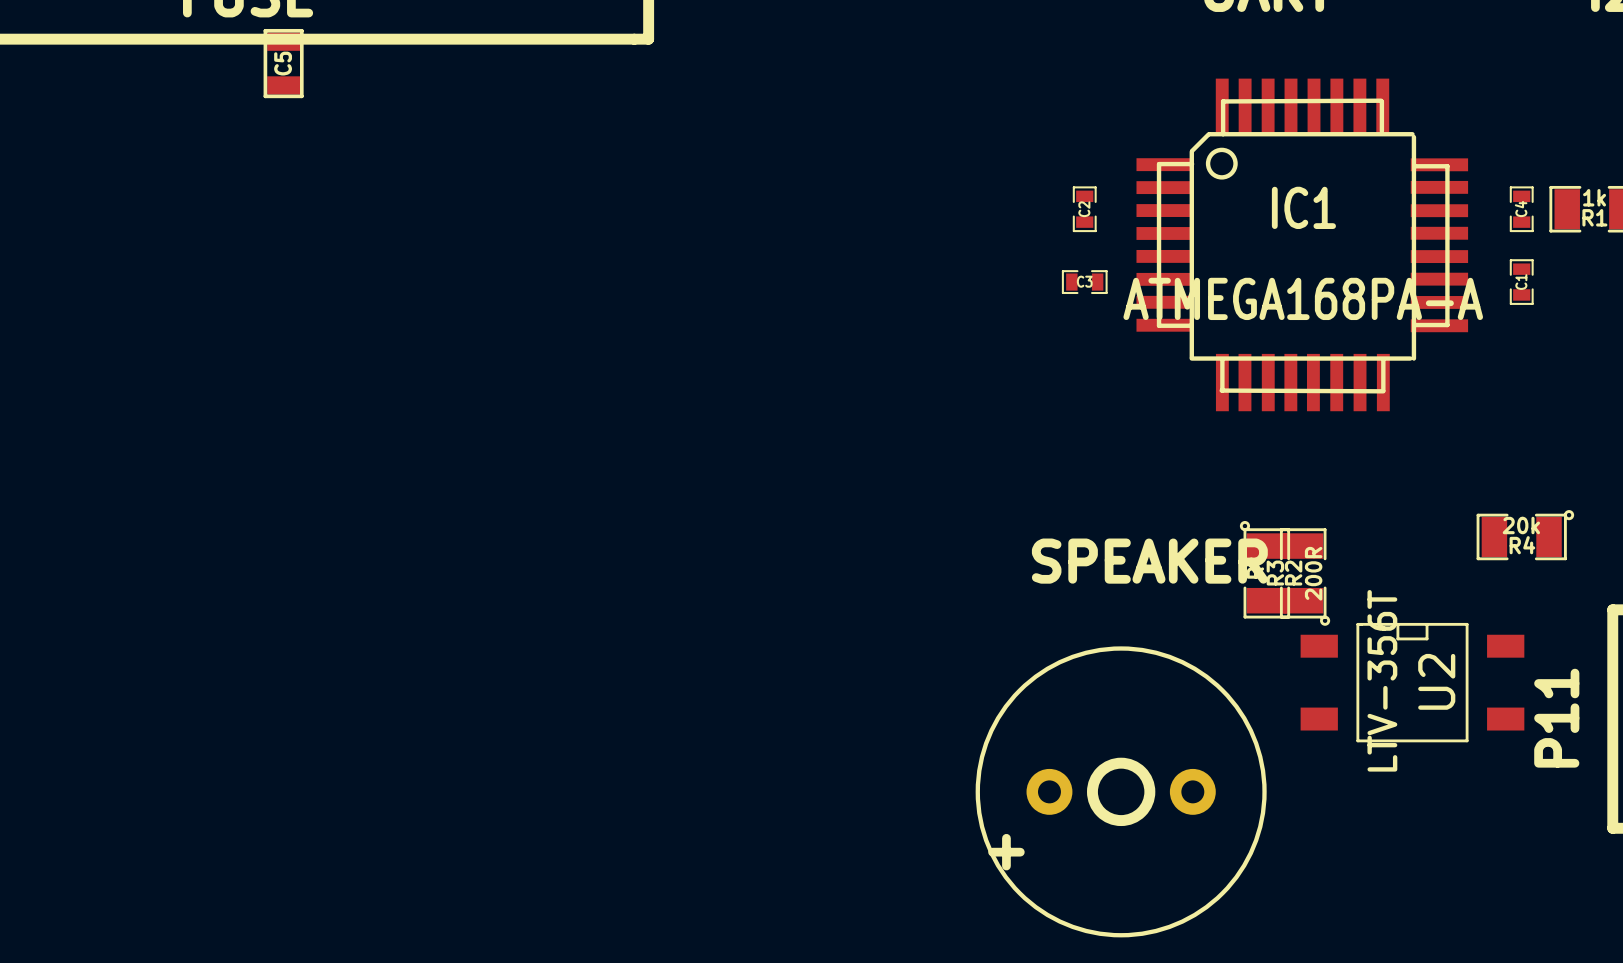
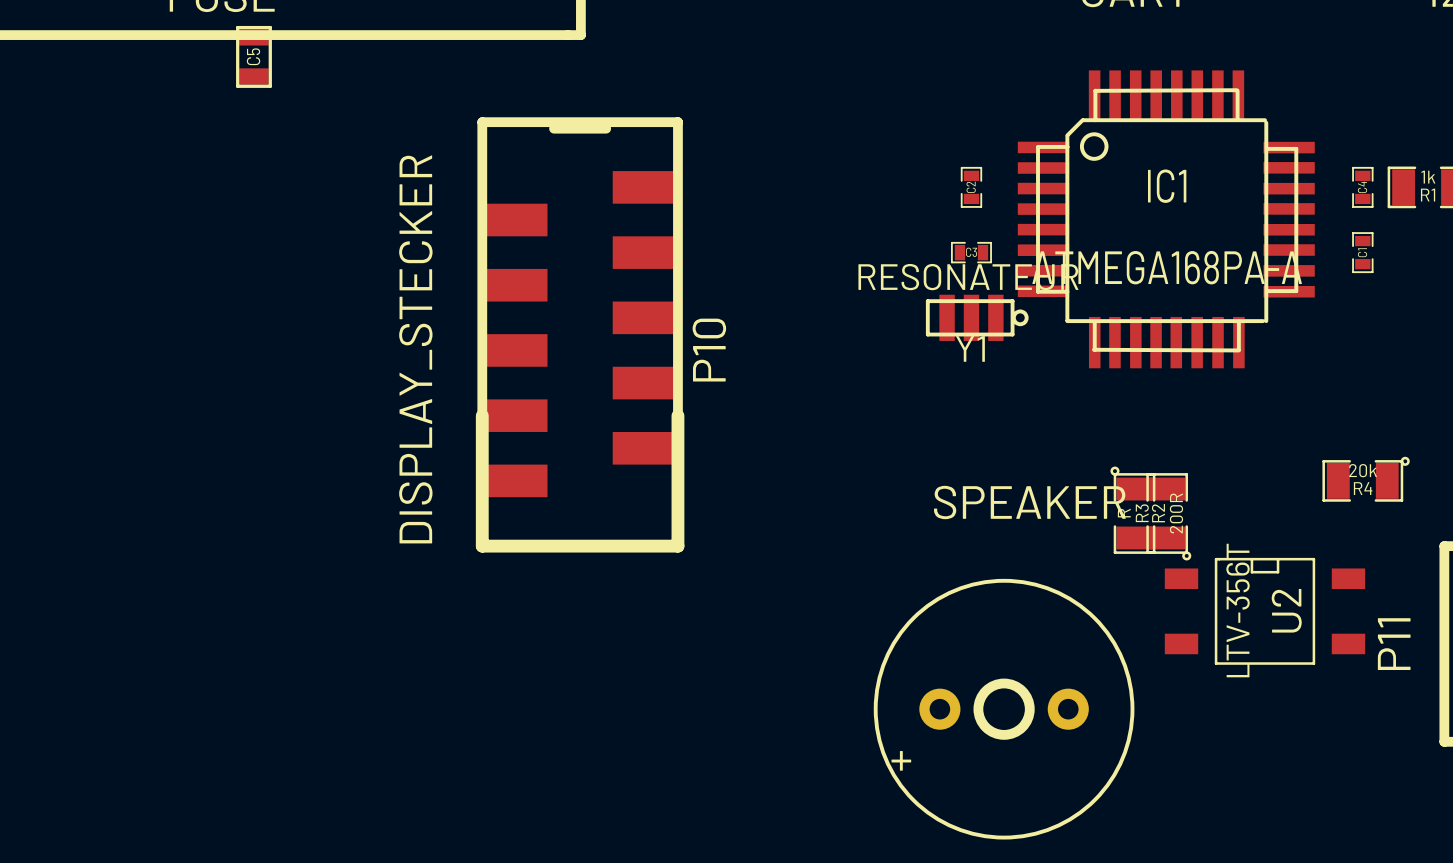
Y1: none -> RESONATEUR (977, 317)
P10: none -> DISPLAY_STECKER (580, 334)

